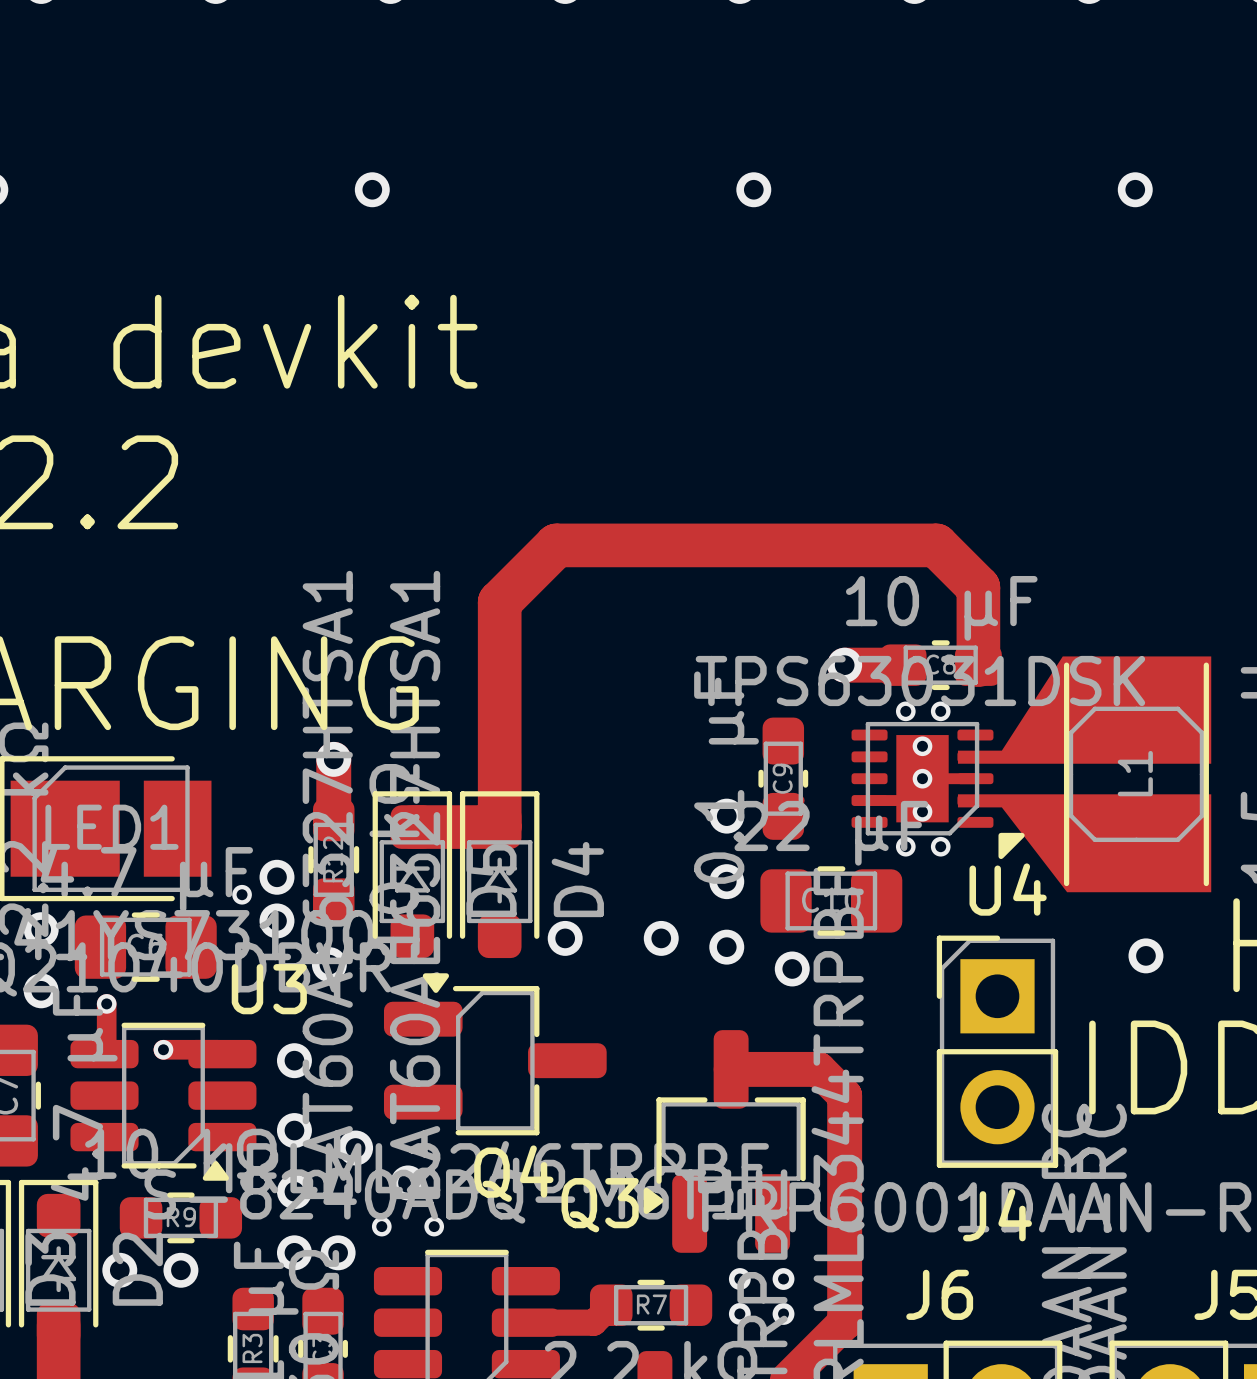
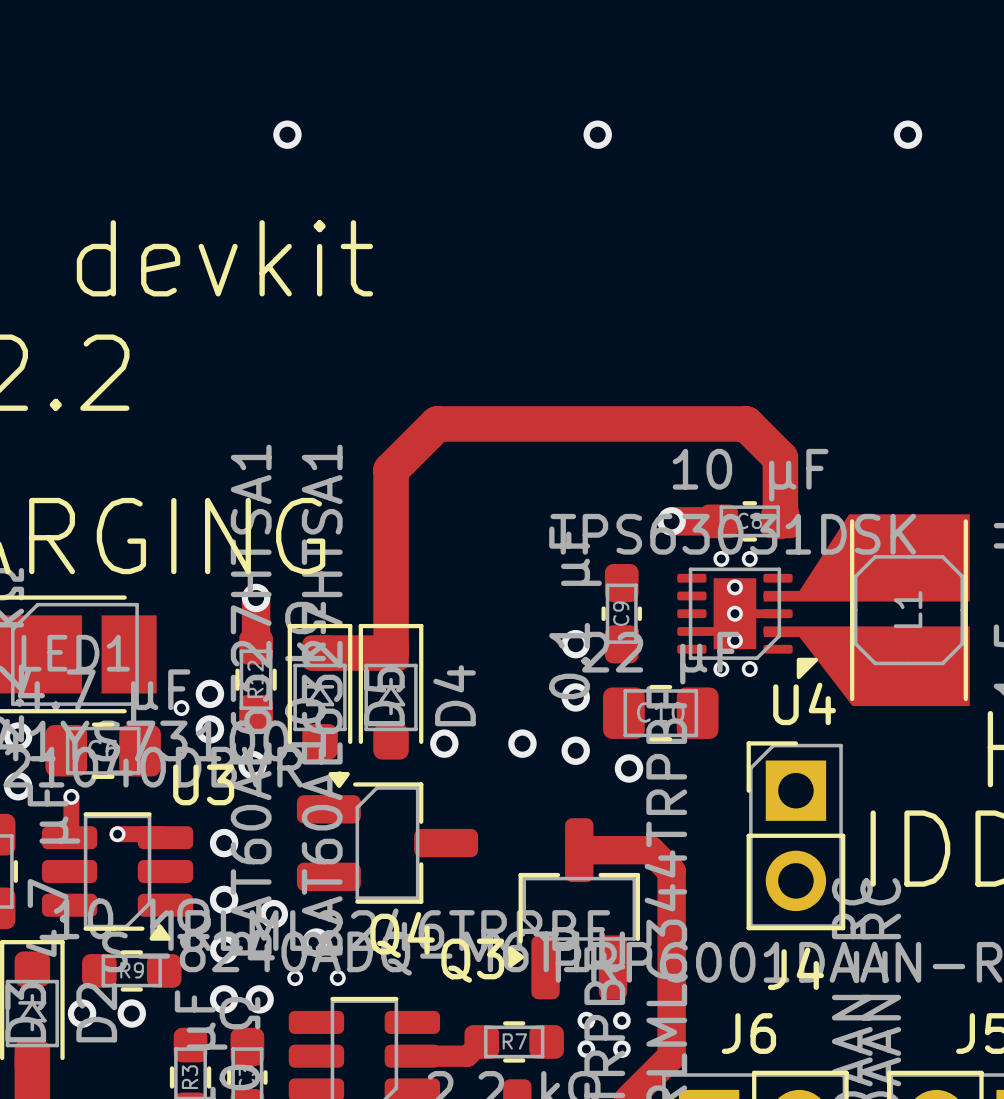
via: (1145, 955) -> none

